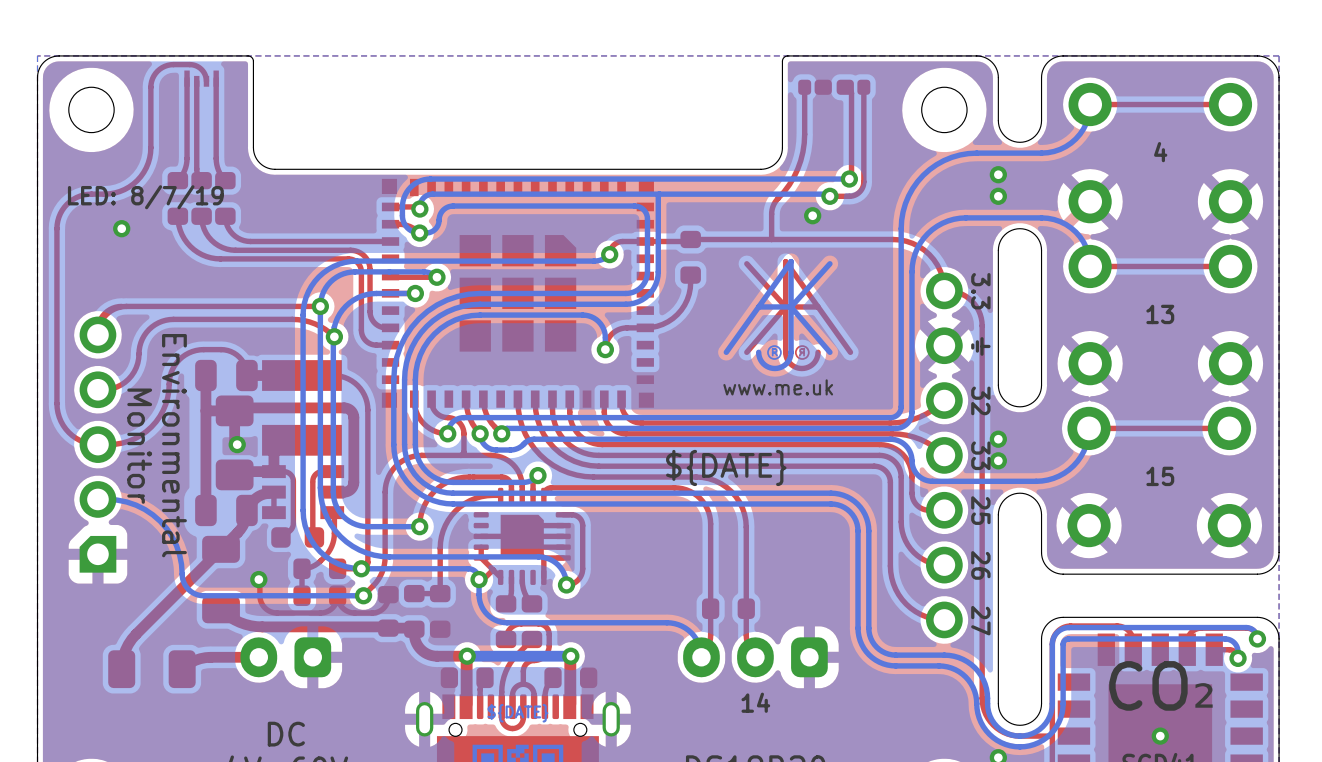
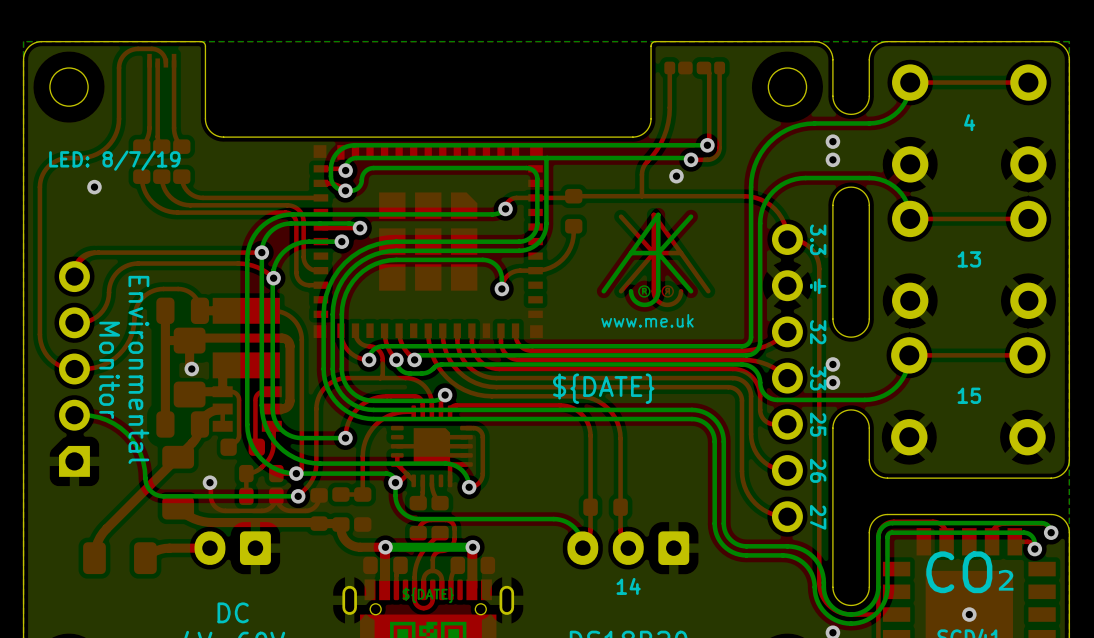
part footprint: [240, 637, 332, 678] -> [194, 531, 271, 565]
part footprint: [683, 637, 828, 678] -> [567, 531, 690, 565]

